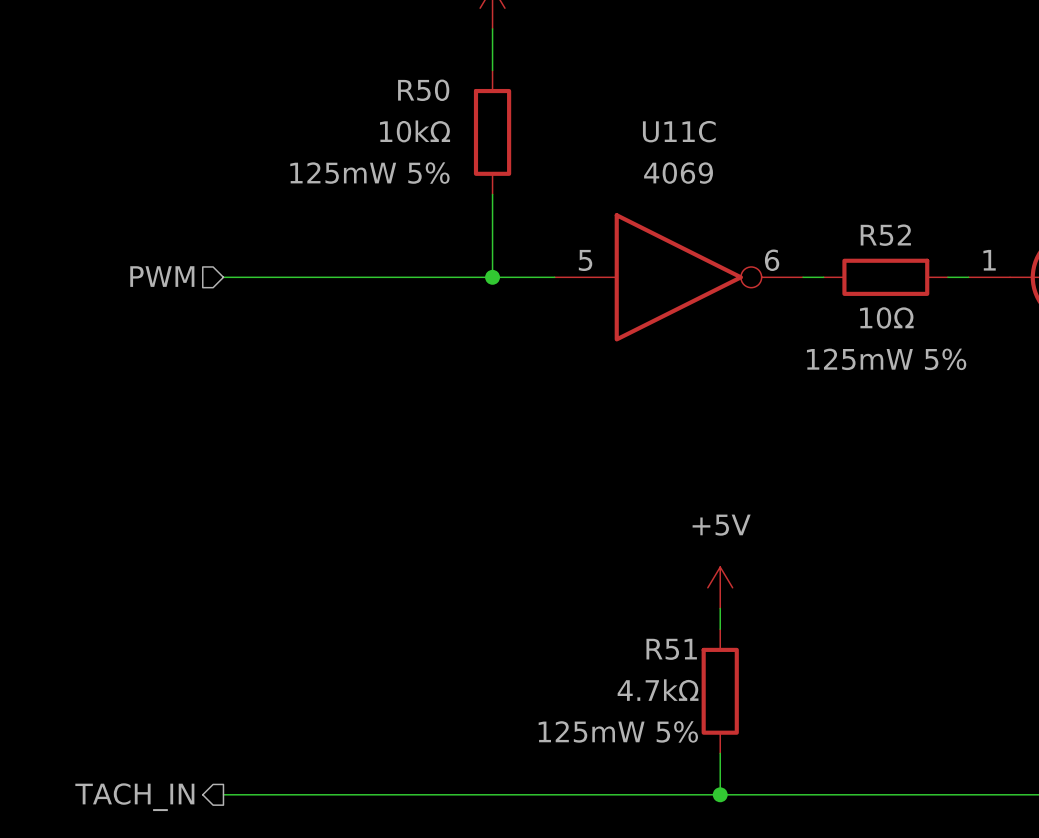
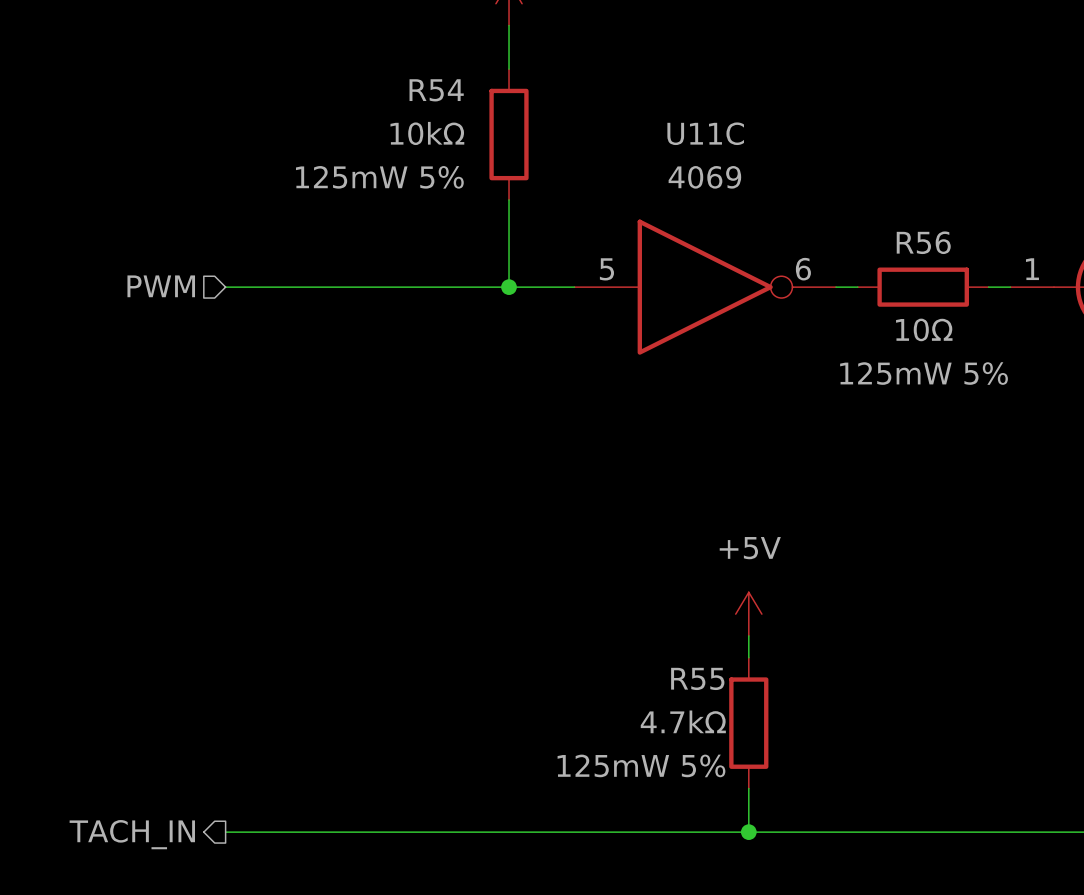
R50 name: R50 (423, 90) -> R54 (436, 90)
R52 name: R52 (885, 235) -> R56 (923, 242)
R51 name: R51 (671, 649) -> R55 (697, 678)

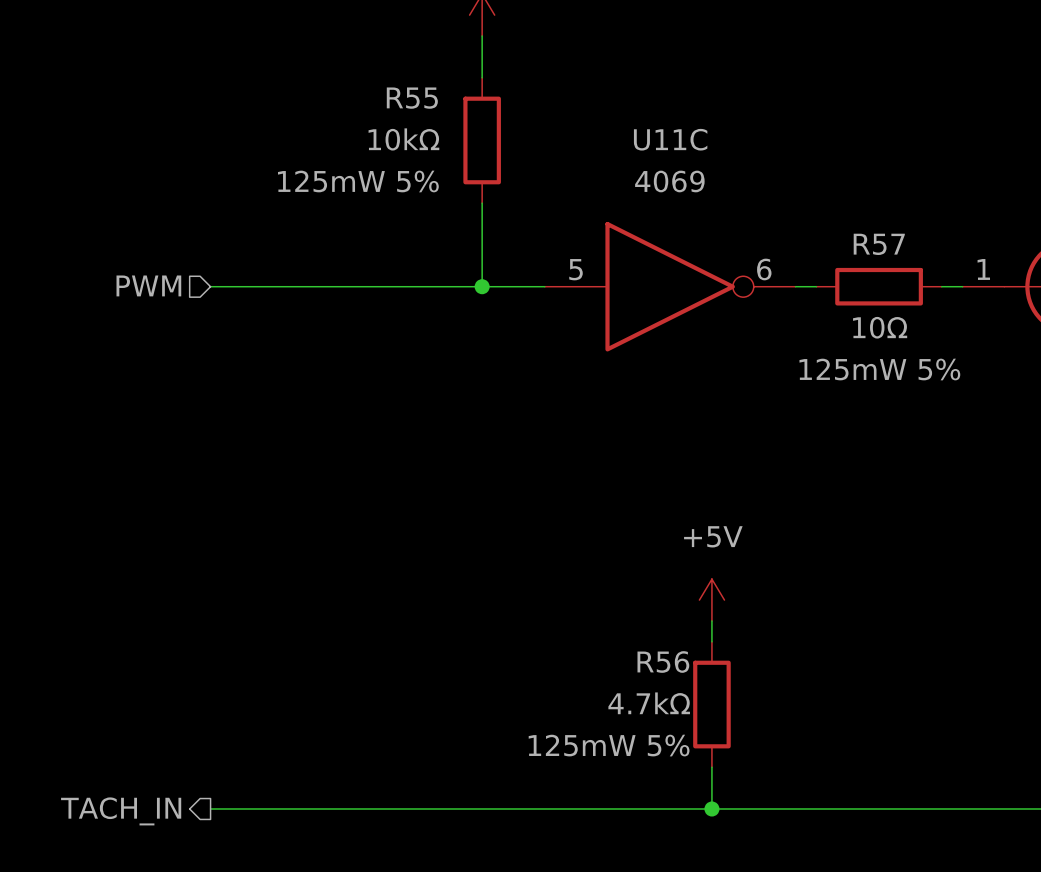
R54 name: R54 (436, 90) -> R55 (412, 98)
R56 name: R56 (923, 242) -> R57 (879, 244)
R55 name: R55 (697, 678) -> R56 (663, 661)

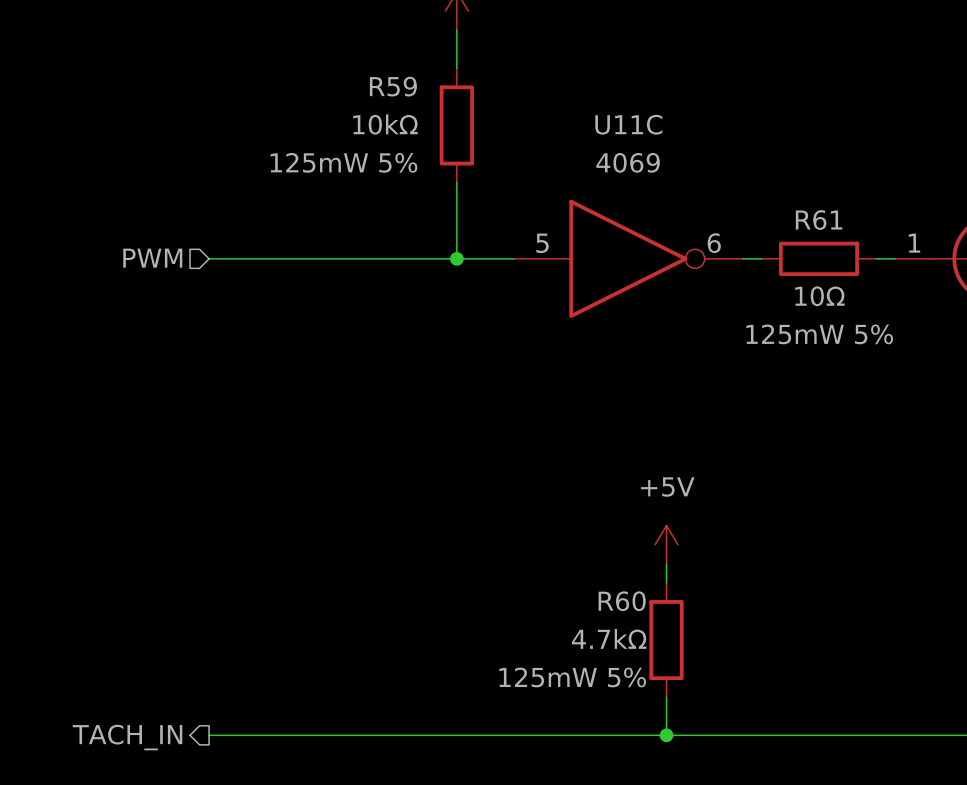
R55 name: R55 (412, 98) -> R59 (393, 86)
R57 name: R57 (879, 244) -> R61 (819, 220)
R56 name: R56 (663, 661) -> R60 (622, 601)

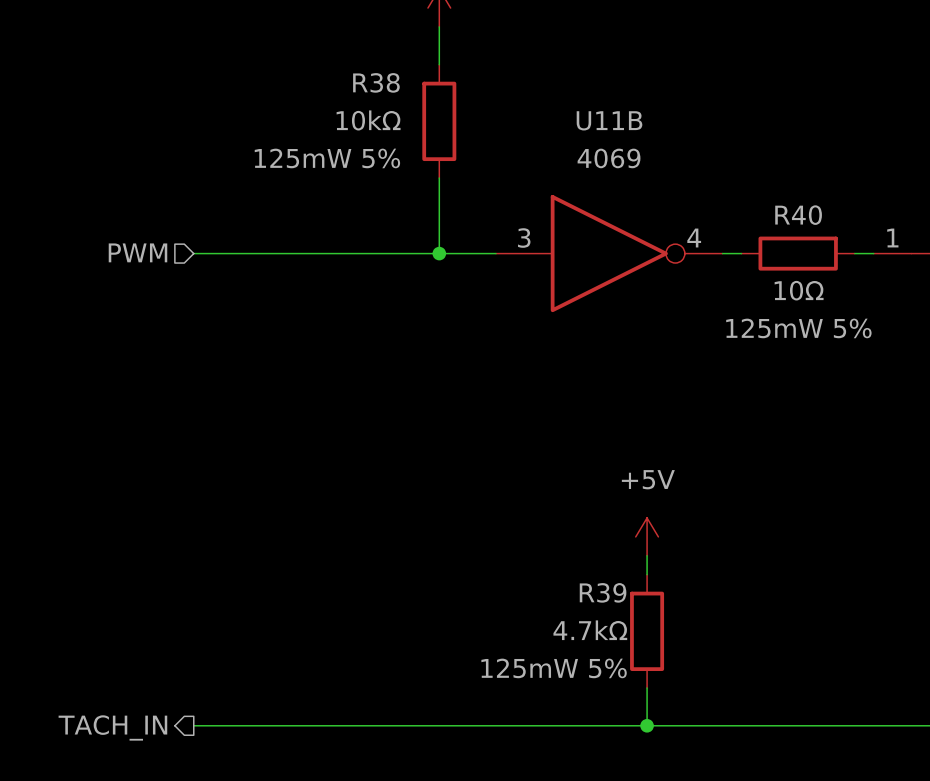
R59 name: R59 (393, 86) -> R38 (376, 82)
U11C name: U11C (628, 124) -> U11B (609, 120)
R61 name: R61 (819, 220) -> R40 (798, 215)
U11C pin number: 5 (542, 243) -> 3 (524, 238)
U11C pin number: 6 (714, 243) -> 4 (694, 238)
R60 name: R60 (622, 601) -> R39 (603, 592)

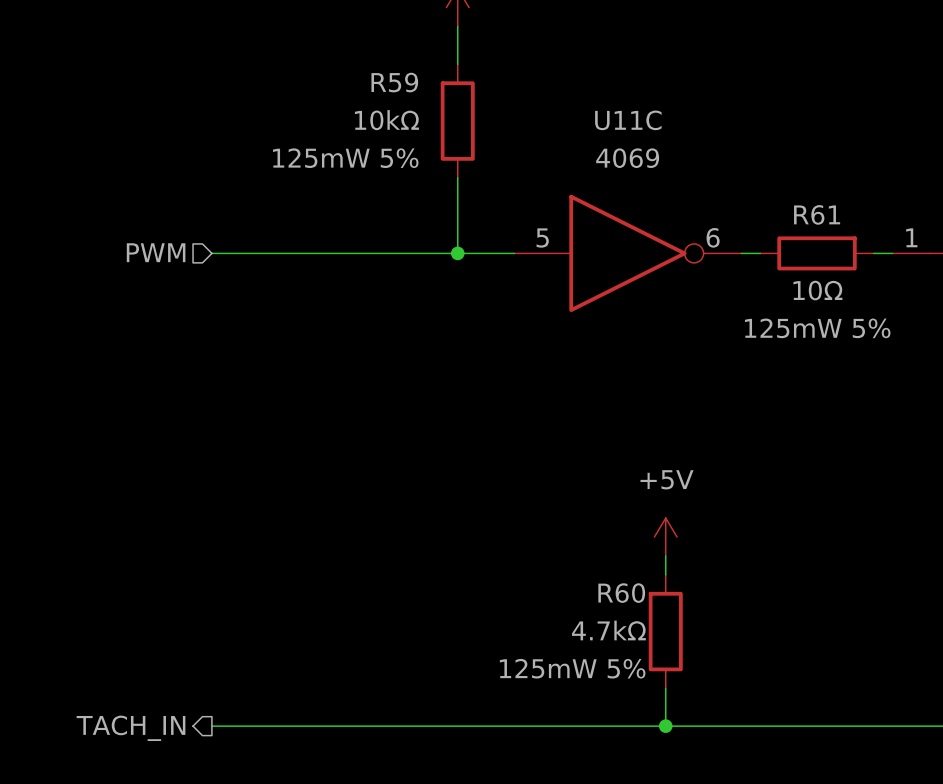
R38 name: R38 (376, 82) -> R59 (394, 82)
U11B name: U11B (609, 120) -> U11C (628, 120)
R40 name: R40 (798, 215) -> R61 (817, 214)
U11B pin number: 3 (524, 238) -> 5 (542, 238)
U11B pin number: 4 (694, 238) -> 6 (713, 237)
R39 name: R39 (603, 592) -> R60 (621, 593)

